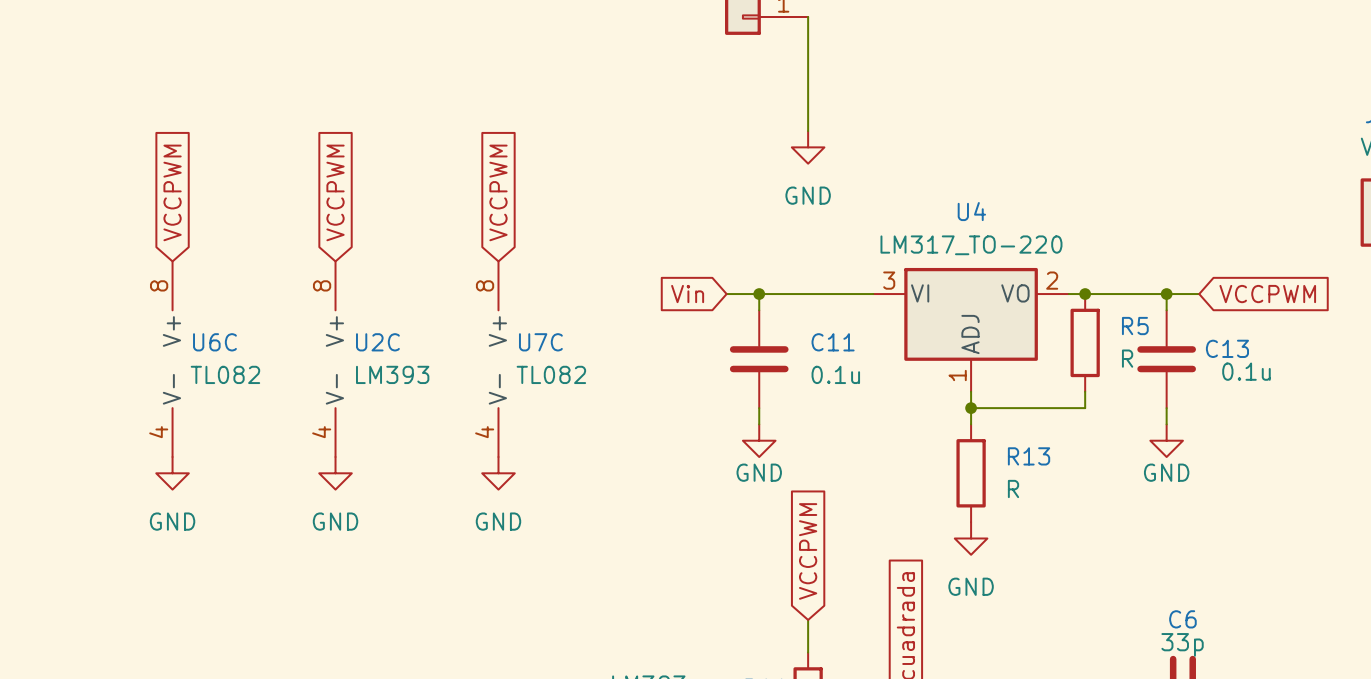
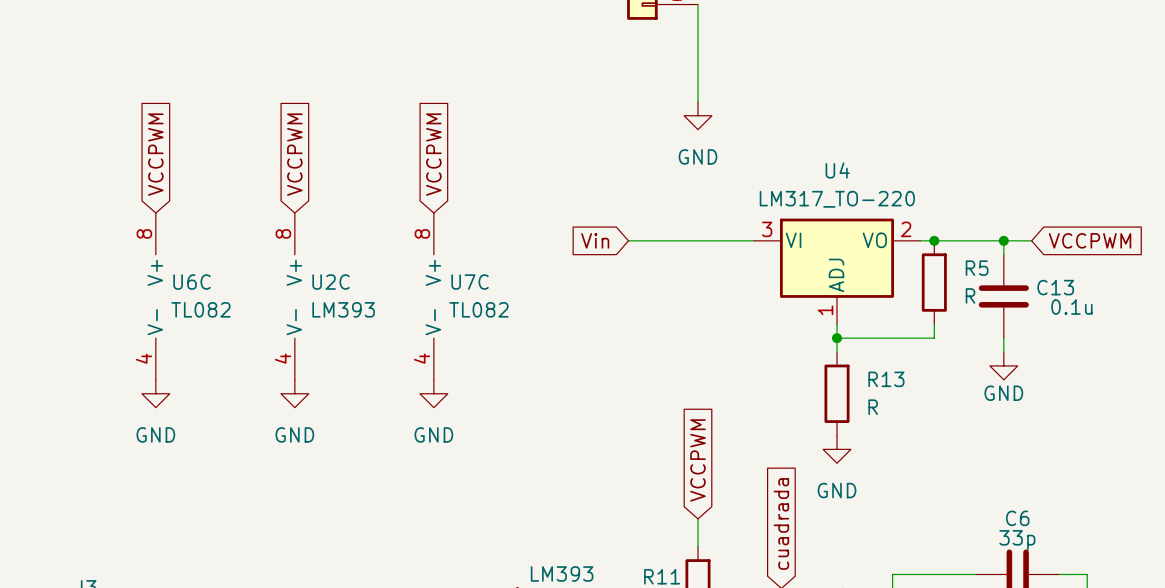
wire: (759, 294) (759, 310) -> none
junction: (759, 294) -> none
C11: 0.1u (759, 359) -> none
wire: (759, 408) (759, 424) -> none
power symbol: GND (759, 440) -> none

